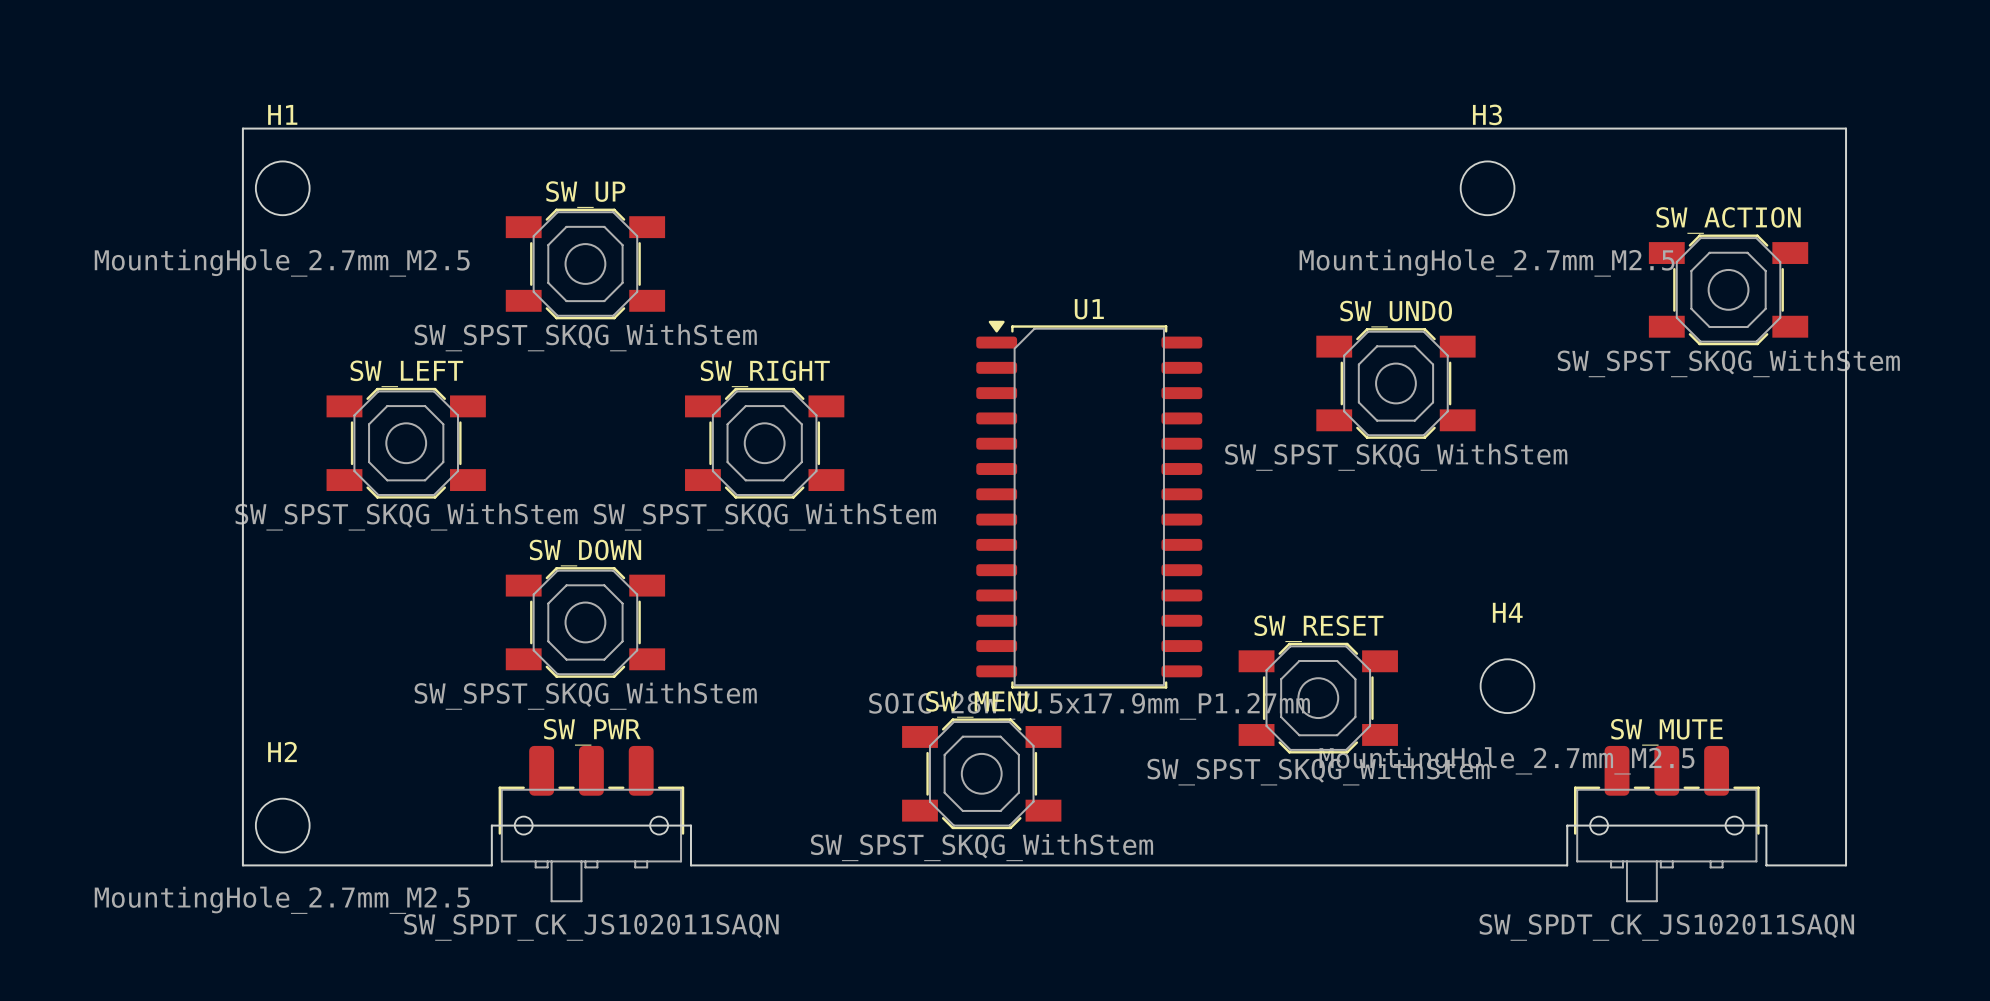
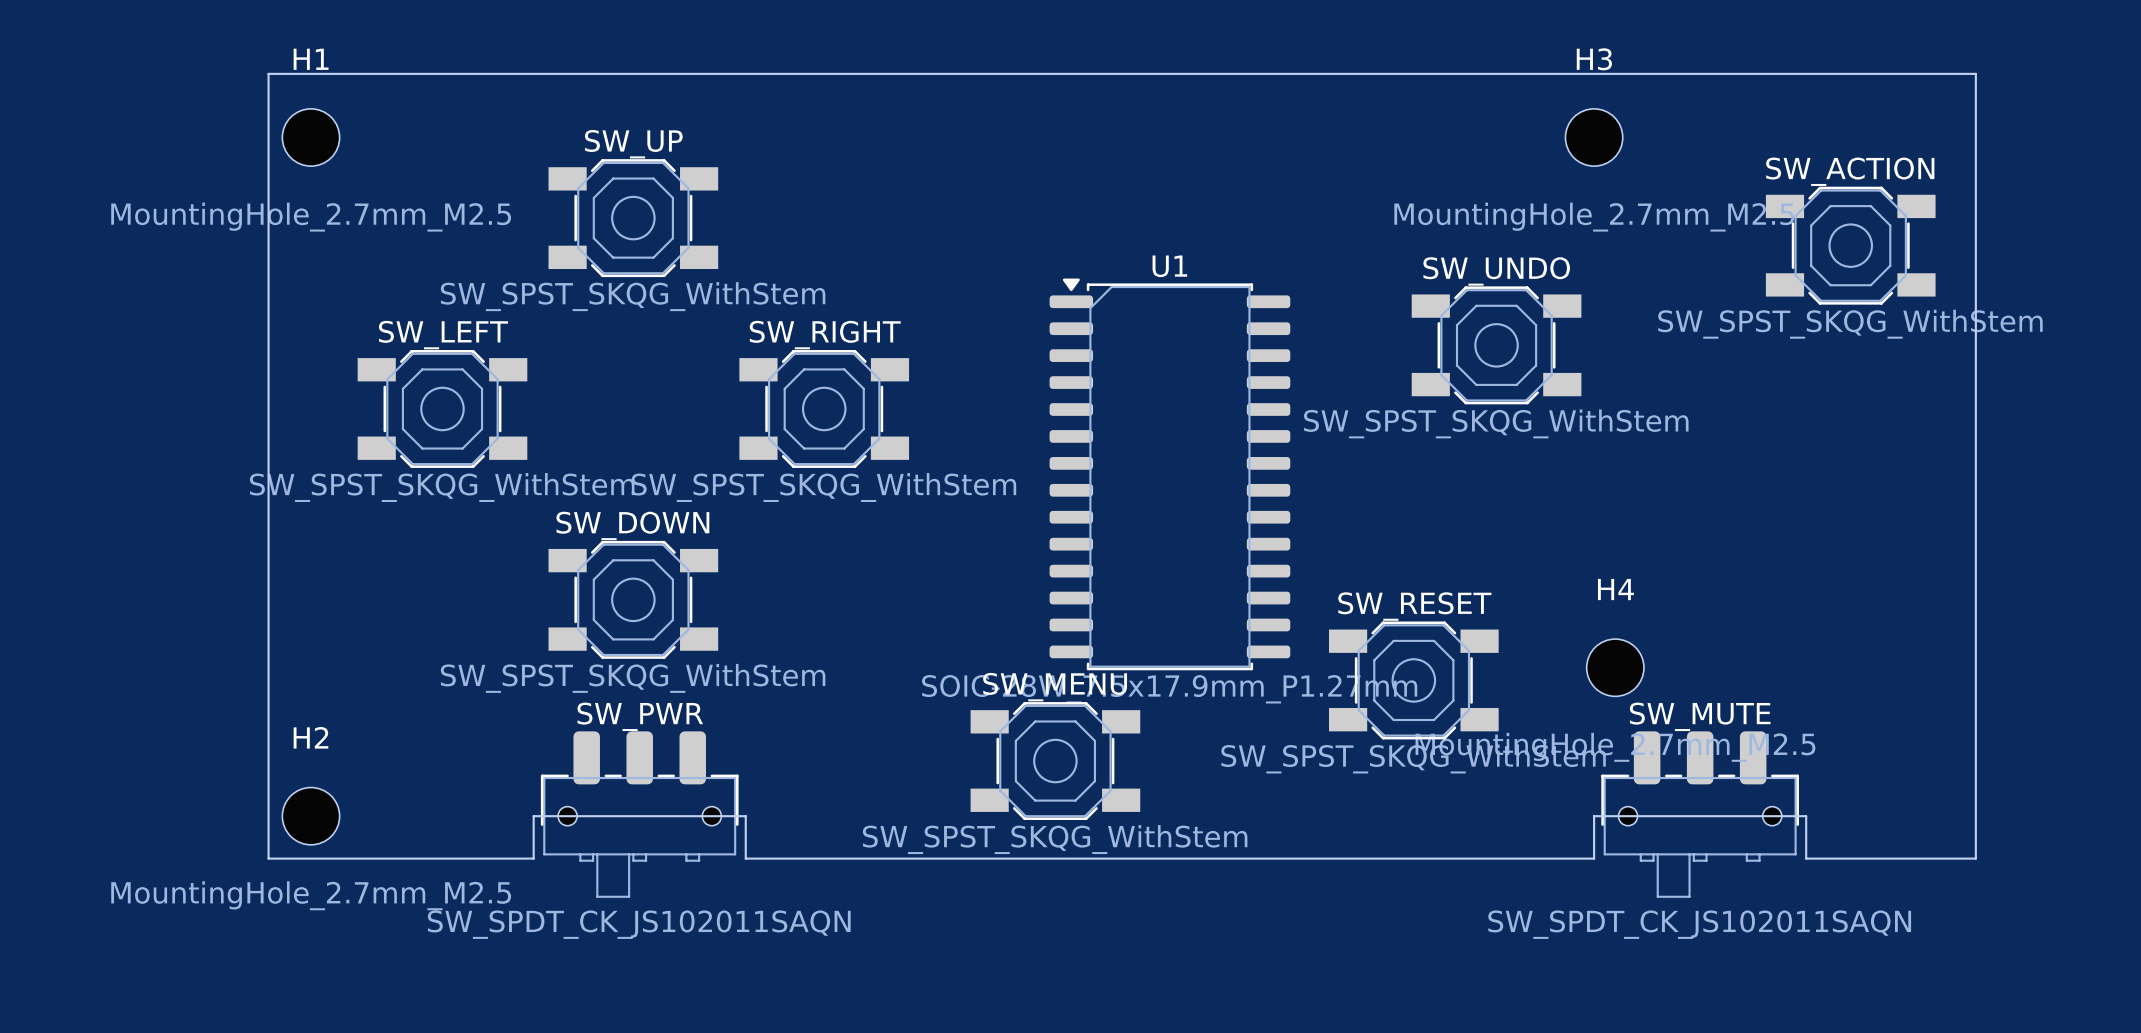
SW_MUTE position: (1666, 824) -> (1700, 814)
board edge: (1567, 825) (1567, 865) (1487, 865) -> (1678, 816) (1594, 816) (1594, 858)
board edge: (1686, 825) (1766, 825) (1766, 865) -> (1806, 816) (1806, 858) (1891, 858)

